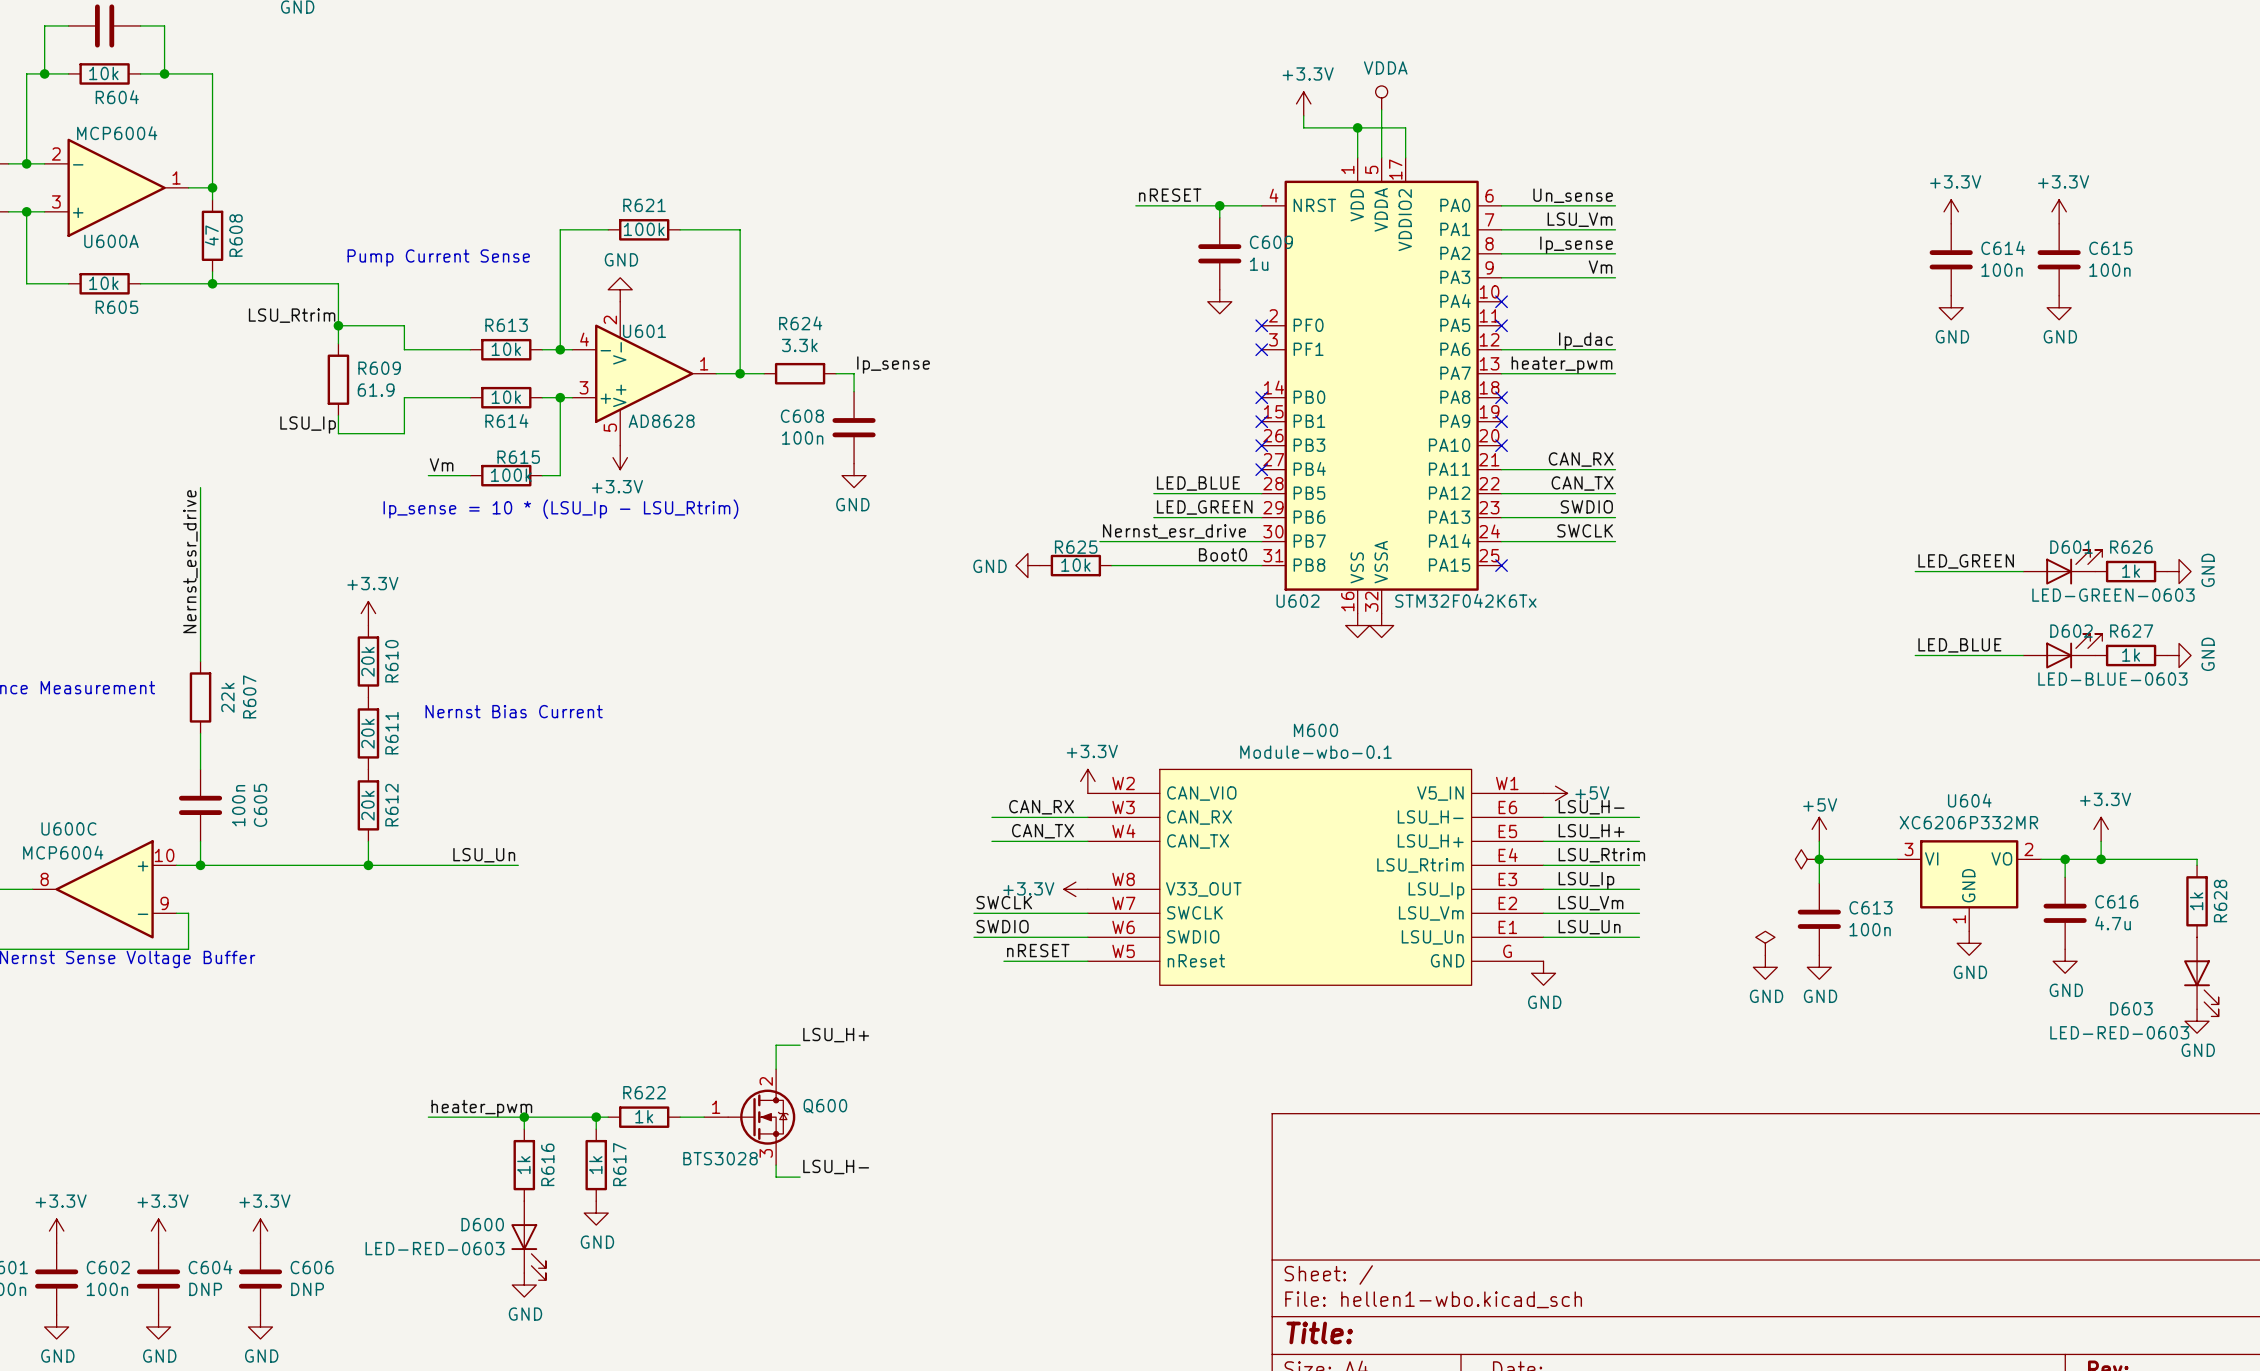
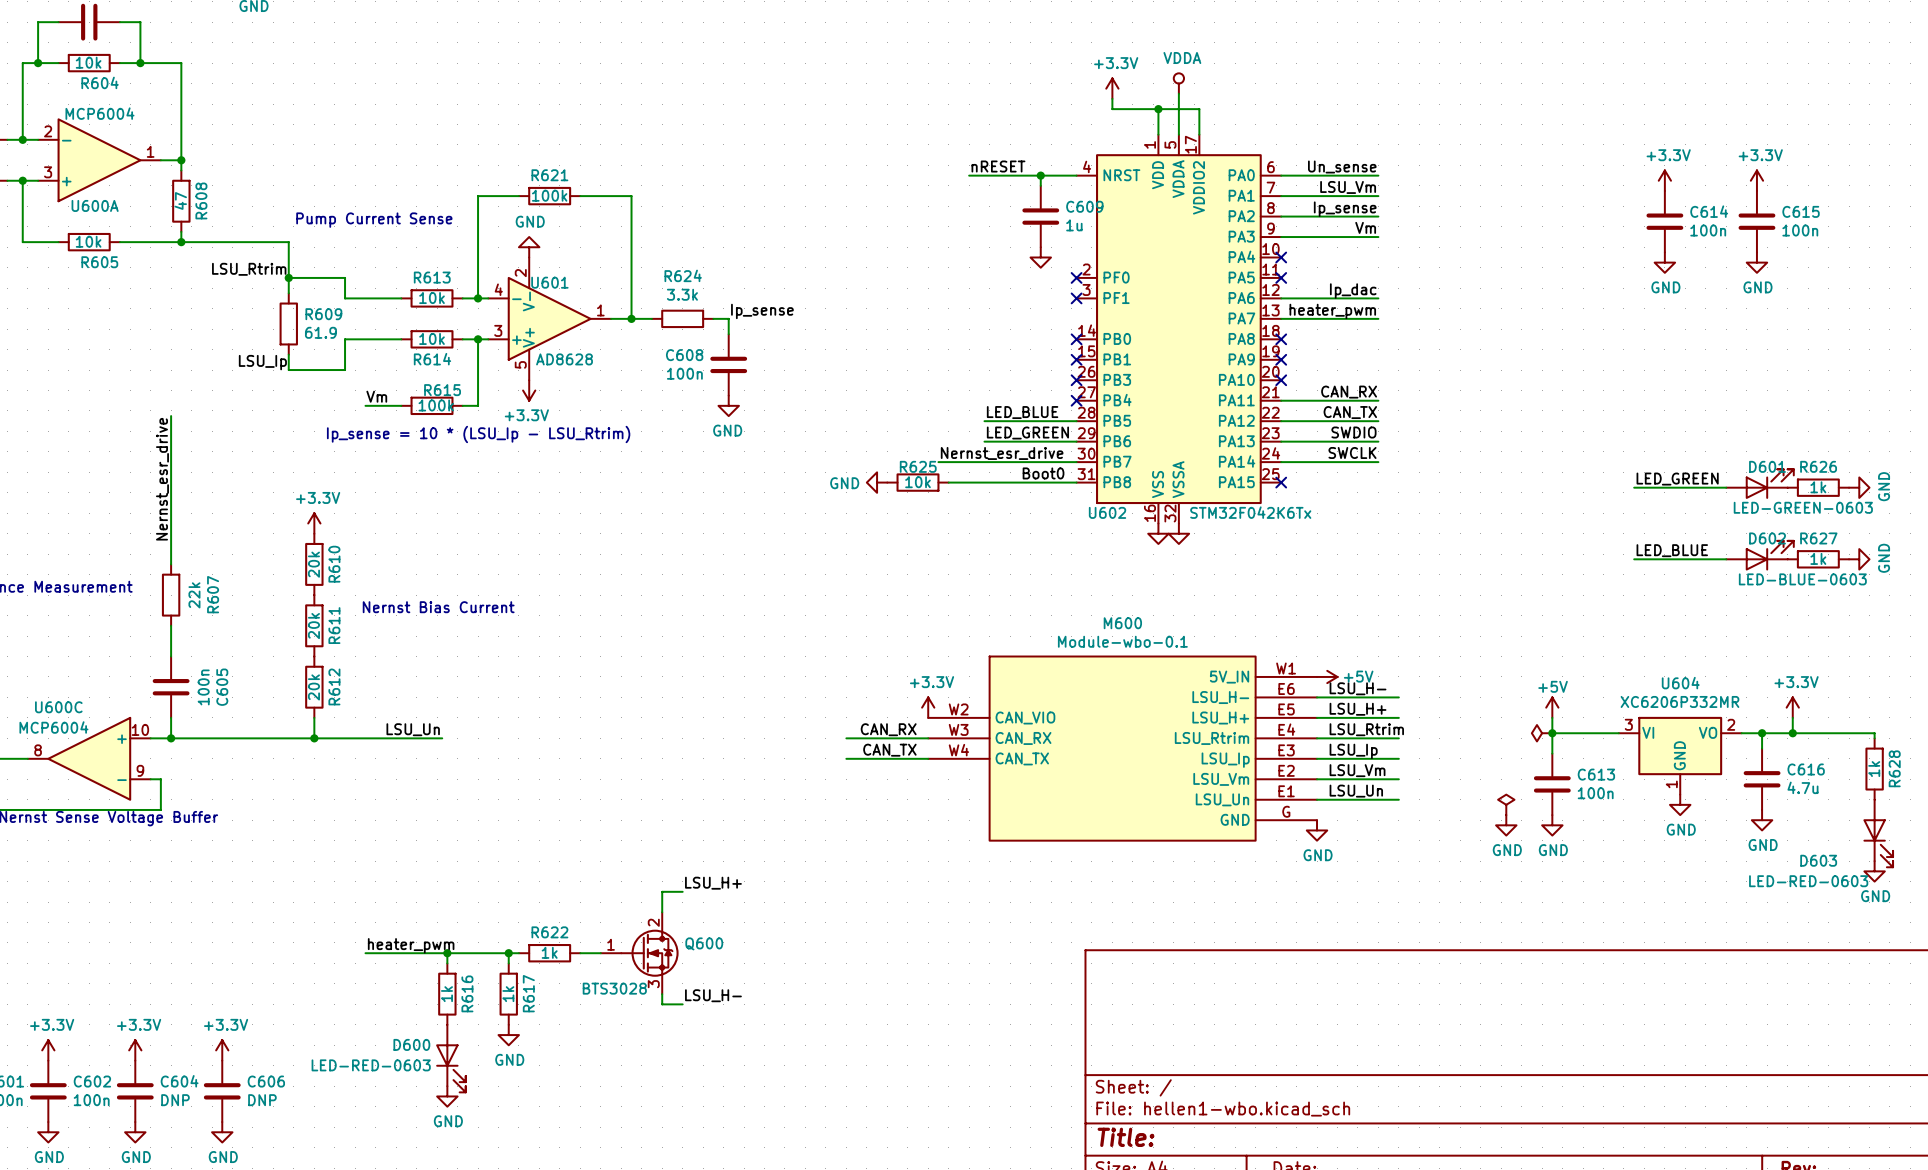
M600 symbol: [1087, 769, 1544, 986] -> [928, 656, 1318, 841]
power symbol: +3.3V (1087, 781) -> none
label position: CAN_RX (1041, 807) -> CAN_RX (888, 729)
wire: (991, 817) (1087, 817) -> (846, 738) (928, 738)
power symbol: none -> +3.3V (928, 707)
label position: CAN_TX (1042, 831) -> CAN_TX (889, 750)
wire: (991, 841) (1087, 841) -> (846, 758) (928, 758)
power symbol: +3.3V (1075, 889) -> none
label: SWCLK (1004, 902) -> none
wire: (973, 913) (1087, 913) -> none
label: SWDIO (1002, 926) -> none
wire: (973, 937) (1087, 937) -> none
label: nRESET (1038, 950) -> none
wire: (1003, 961) (1087, 961) -> none

